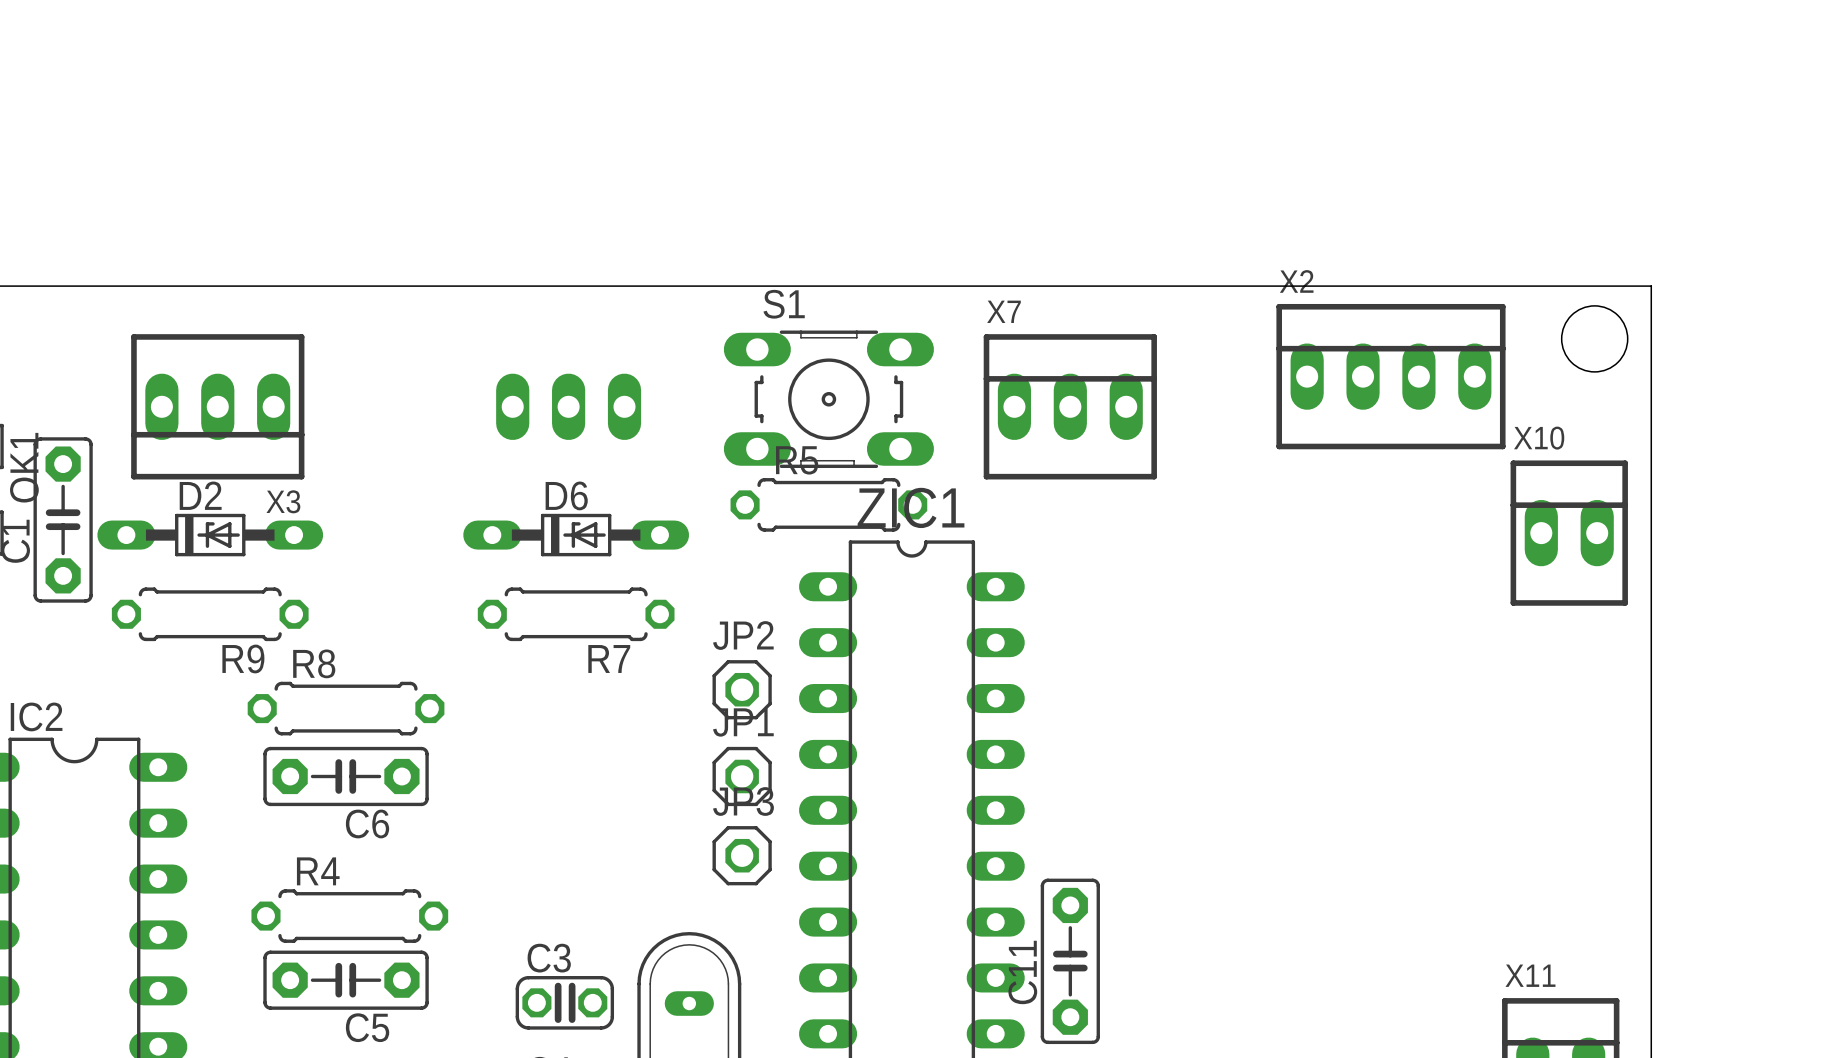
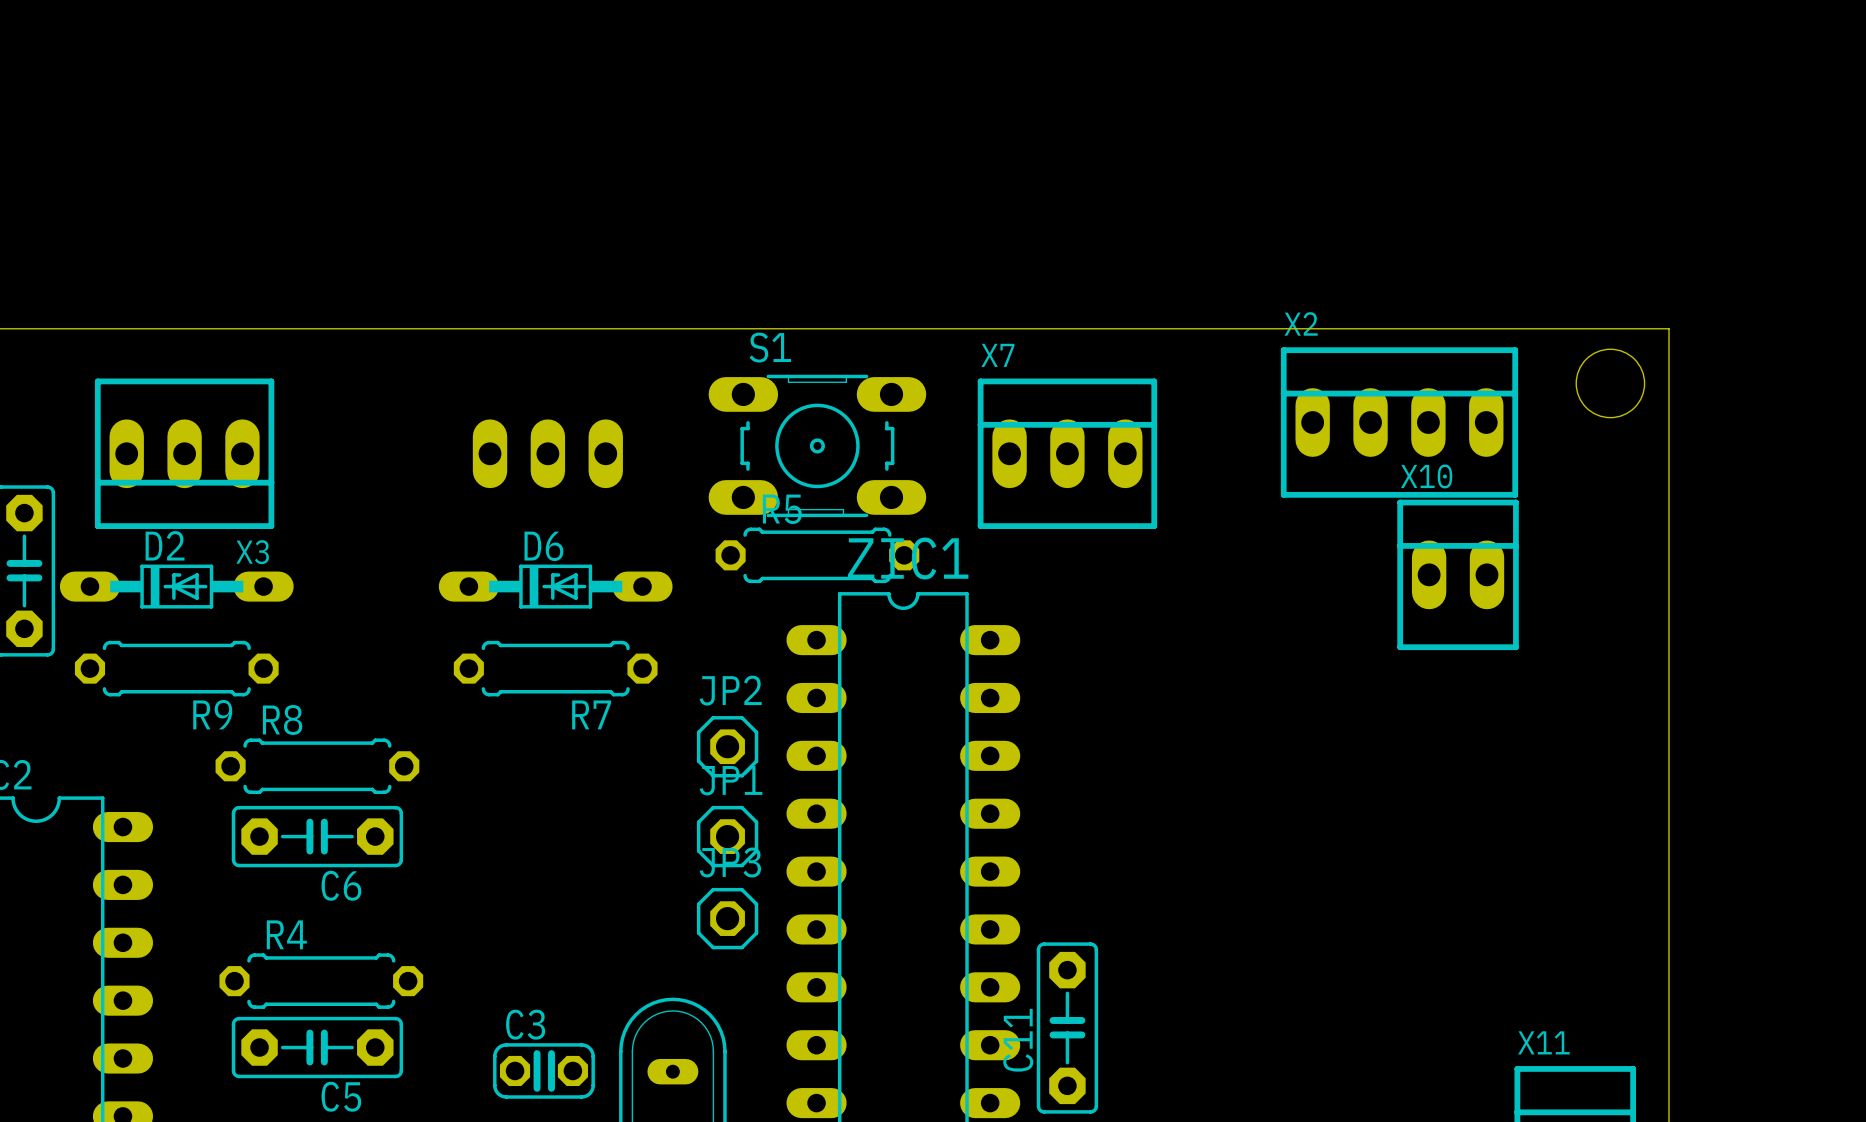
X10 position: (1569, 533) -> (1458, 574)

